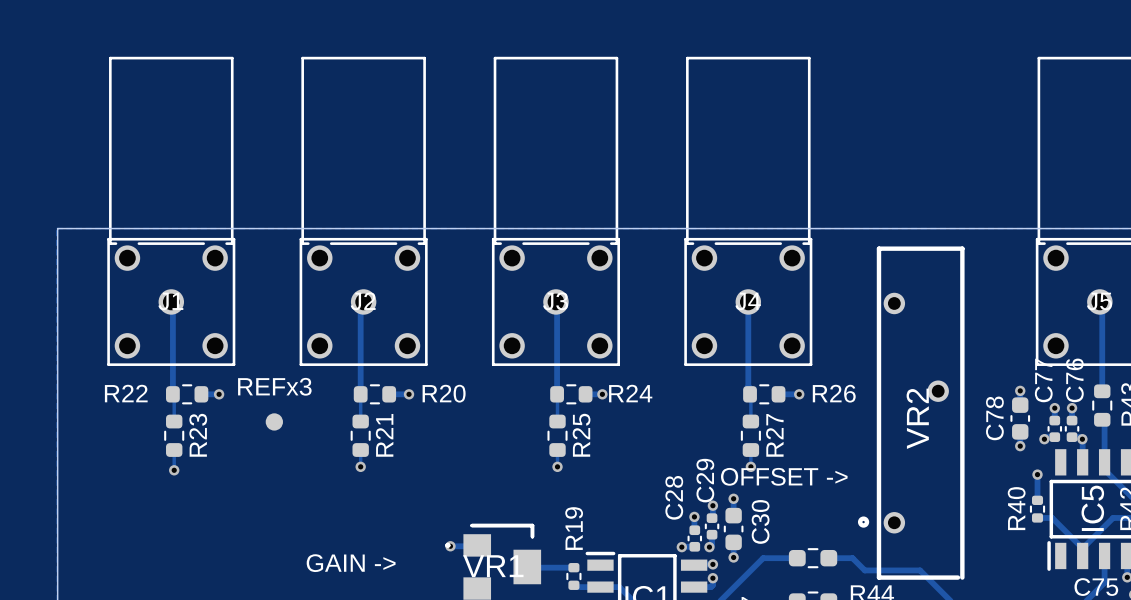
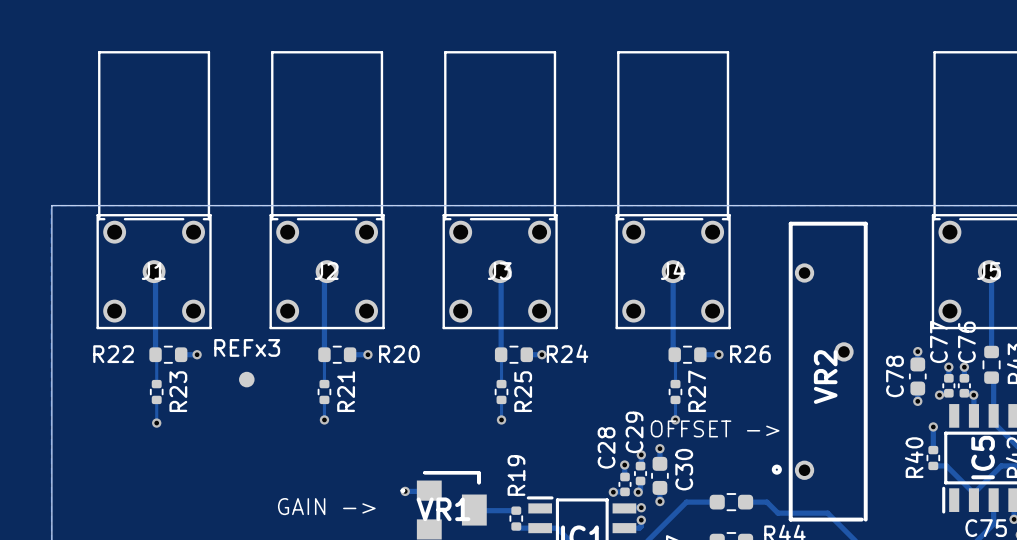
R23 footprint: [164, 414, 185, 457] -> [149, 379, 164, 405]
R21 footprint: [350, 414, 371, 457] -> [317, 379, 332, 405]
R25 footprint: [547, 414, 568, 457] -> [494, 379, 509, 405]
R27 footprint: [740, 414, 761, 457] -> [668, 379, 683, 405]

